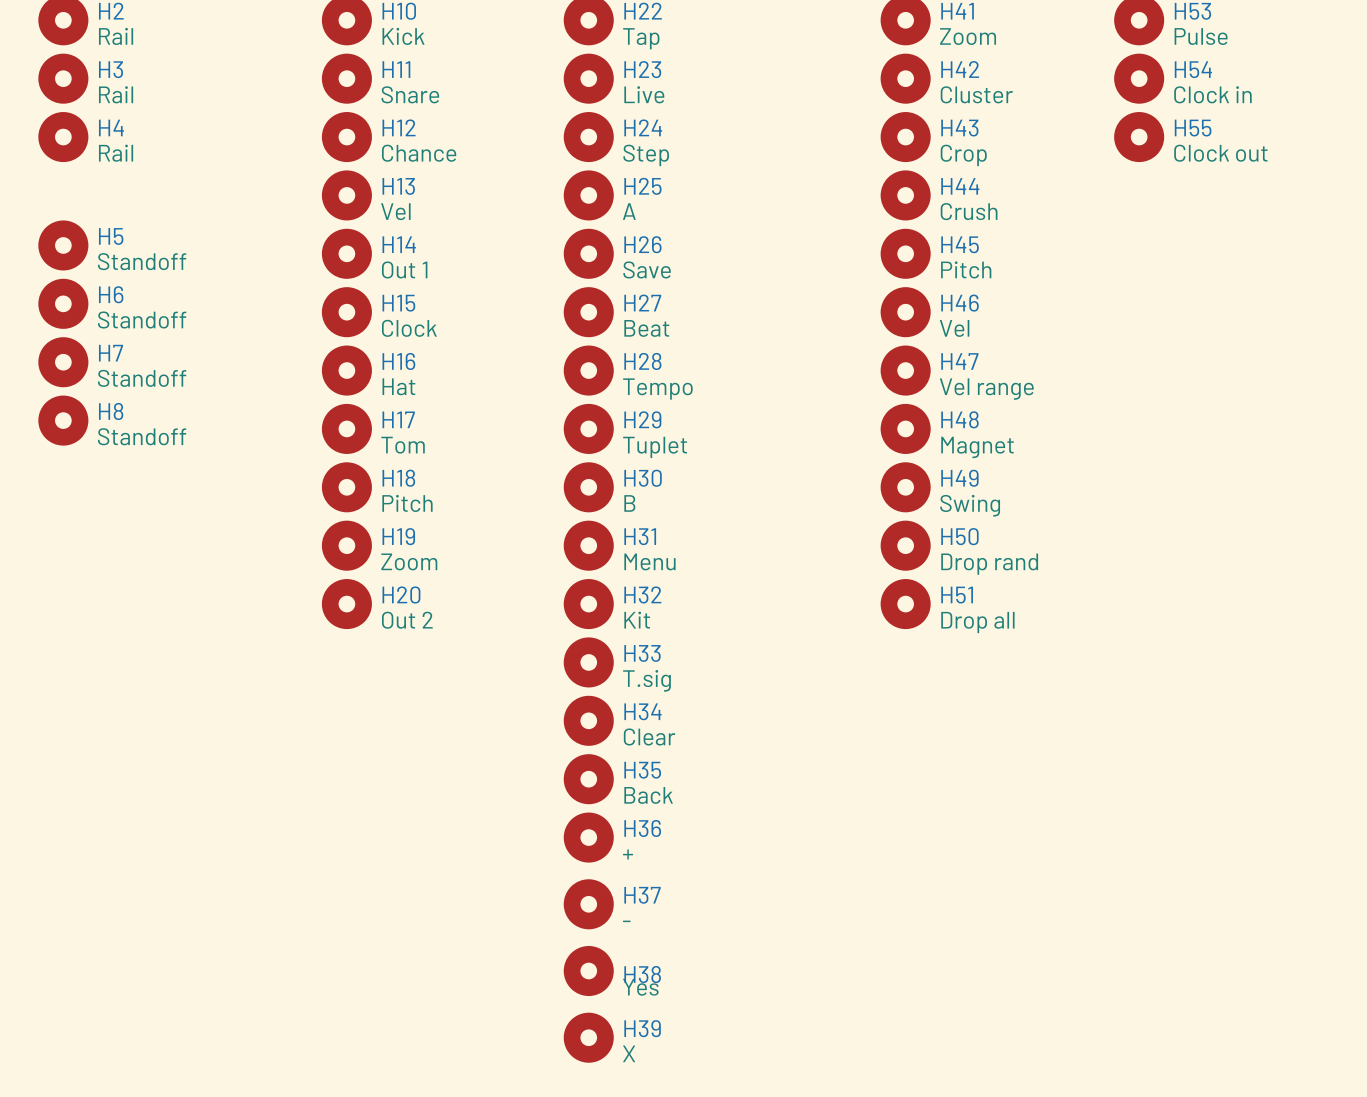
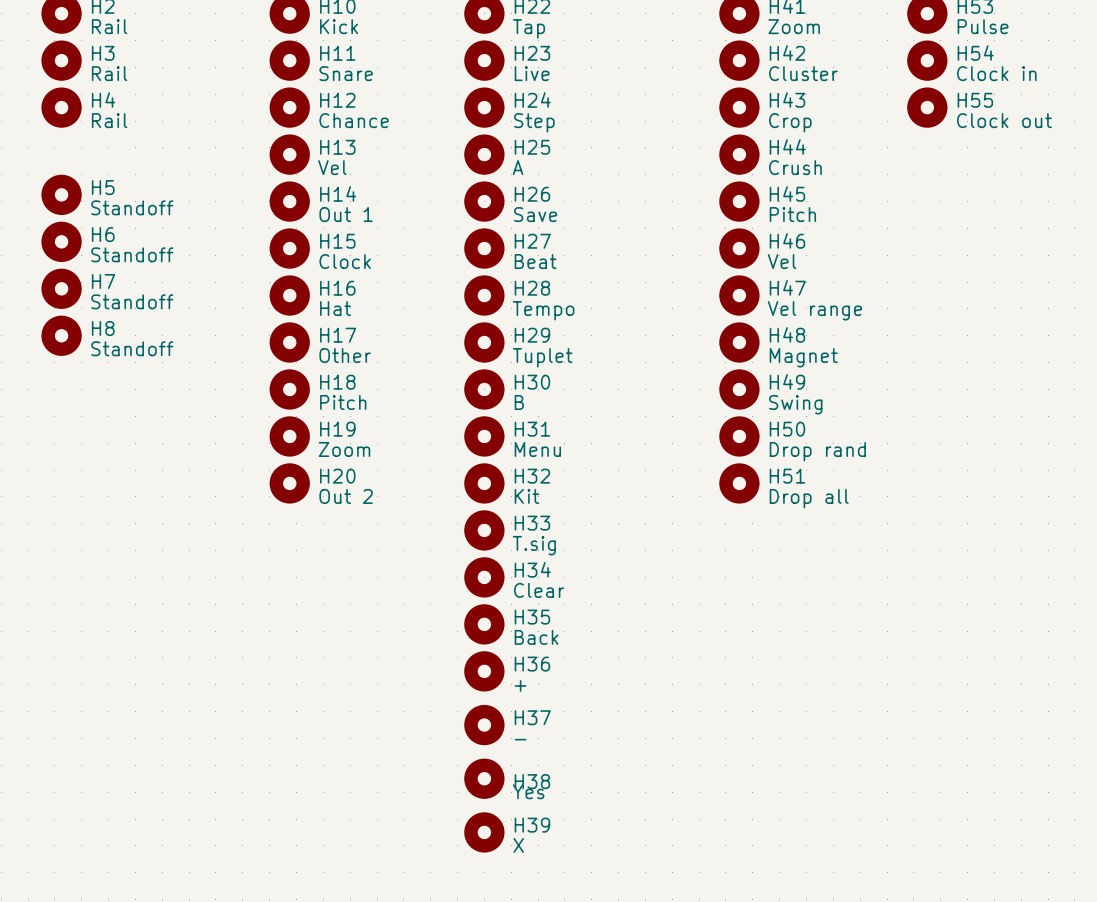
H17 value: Tom (403, 445) -> Other (345, 355)

